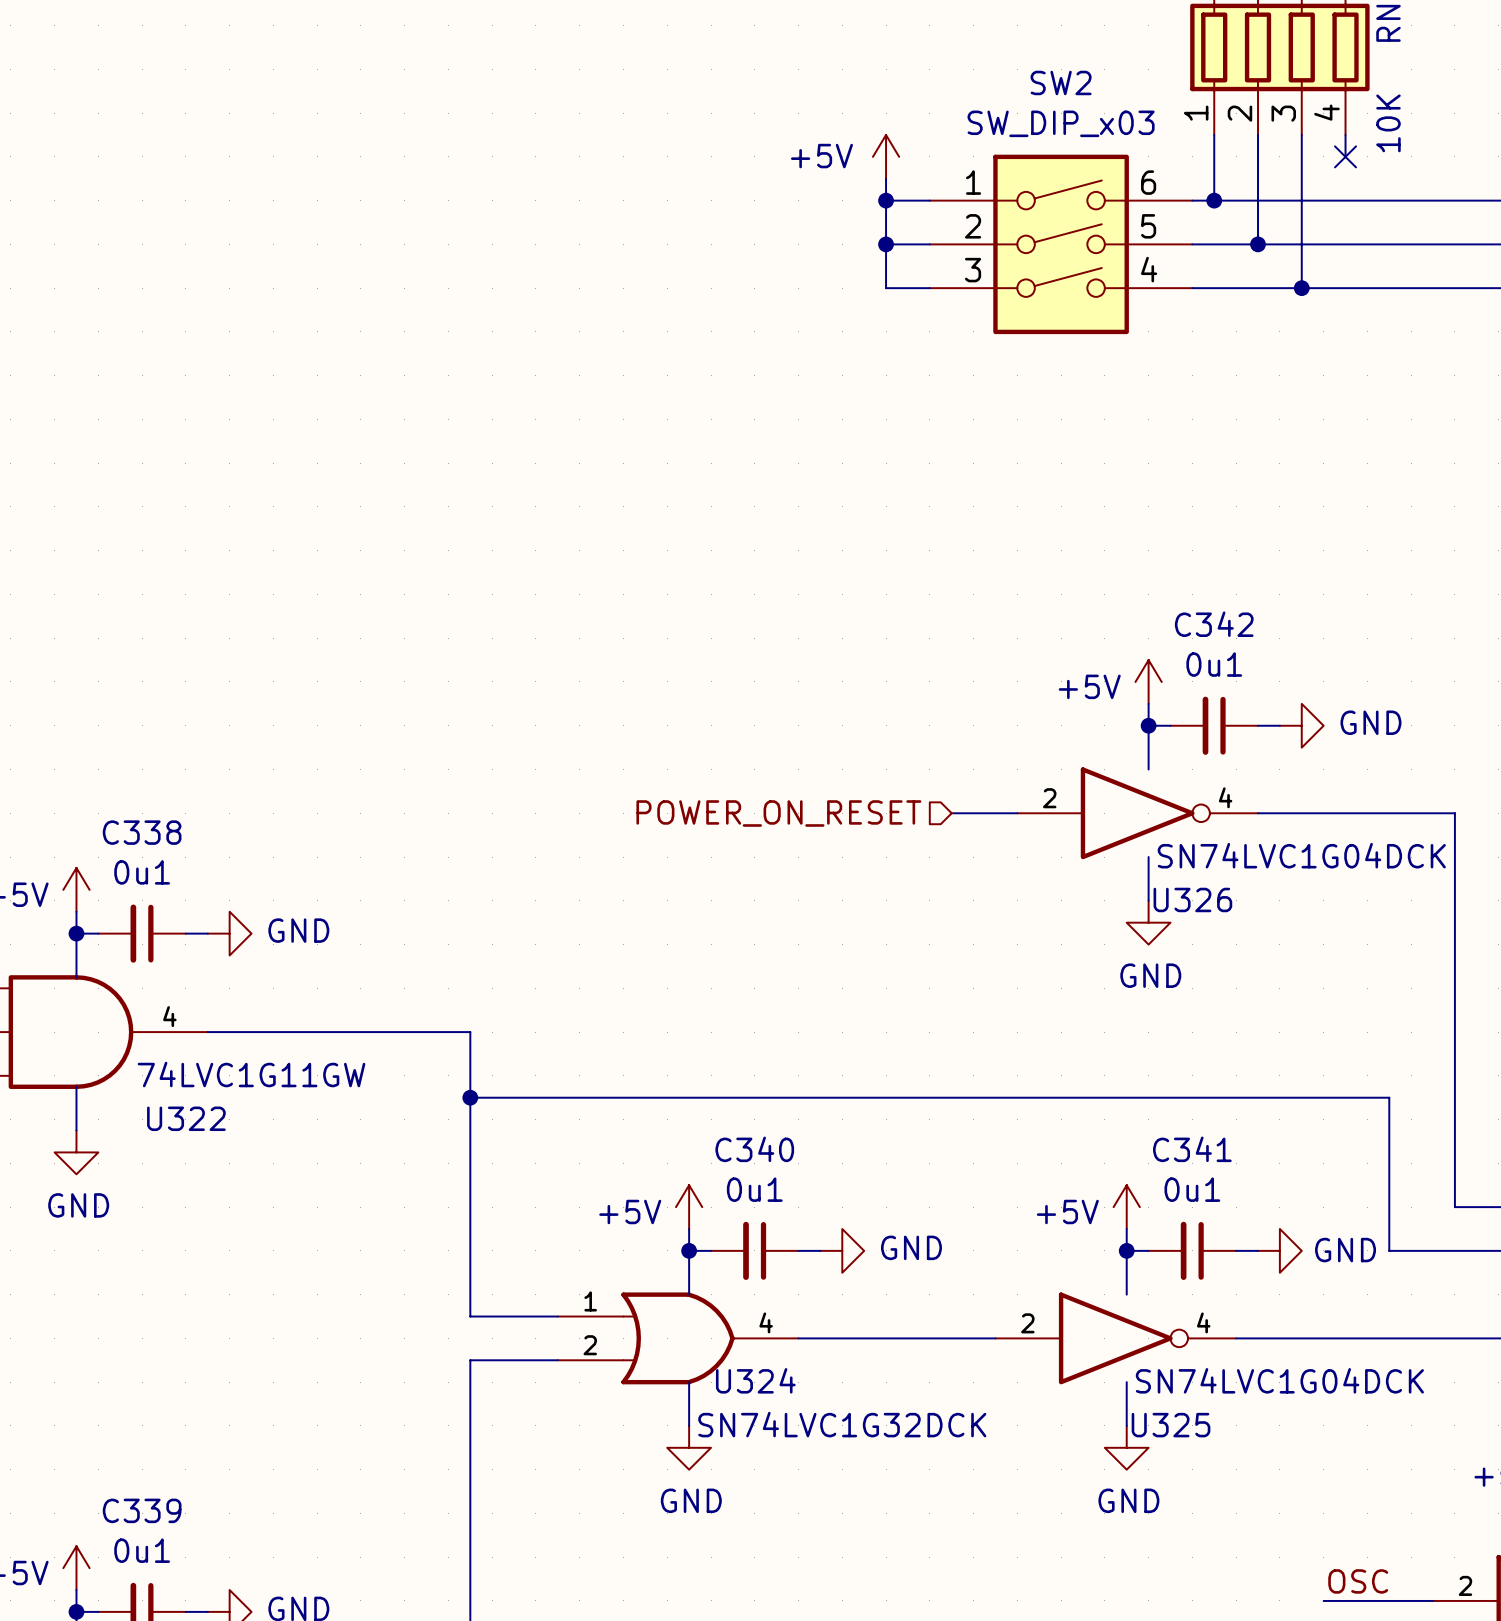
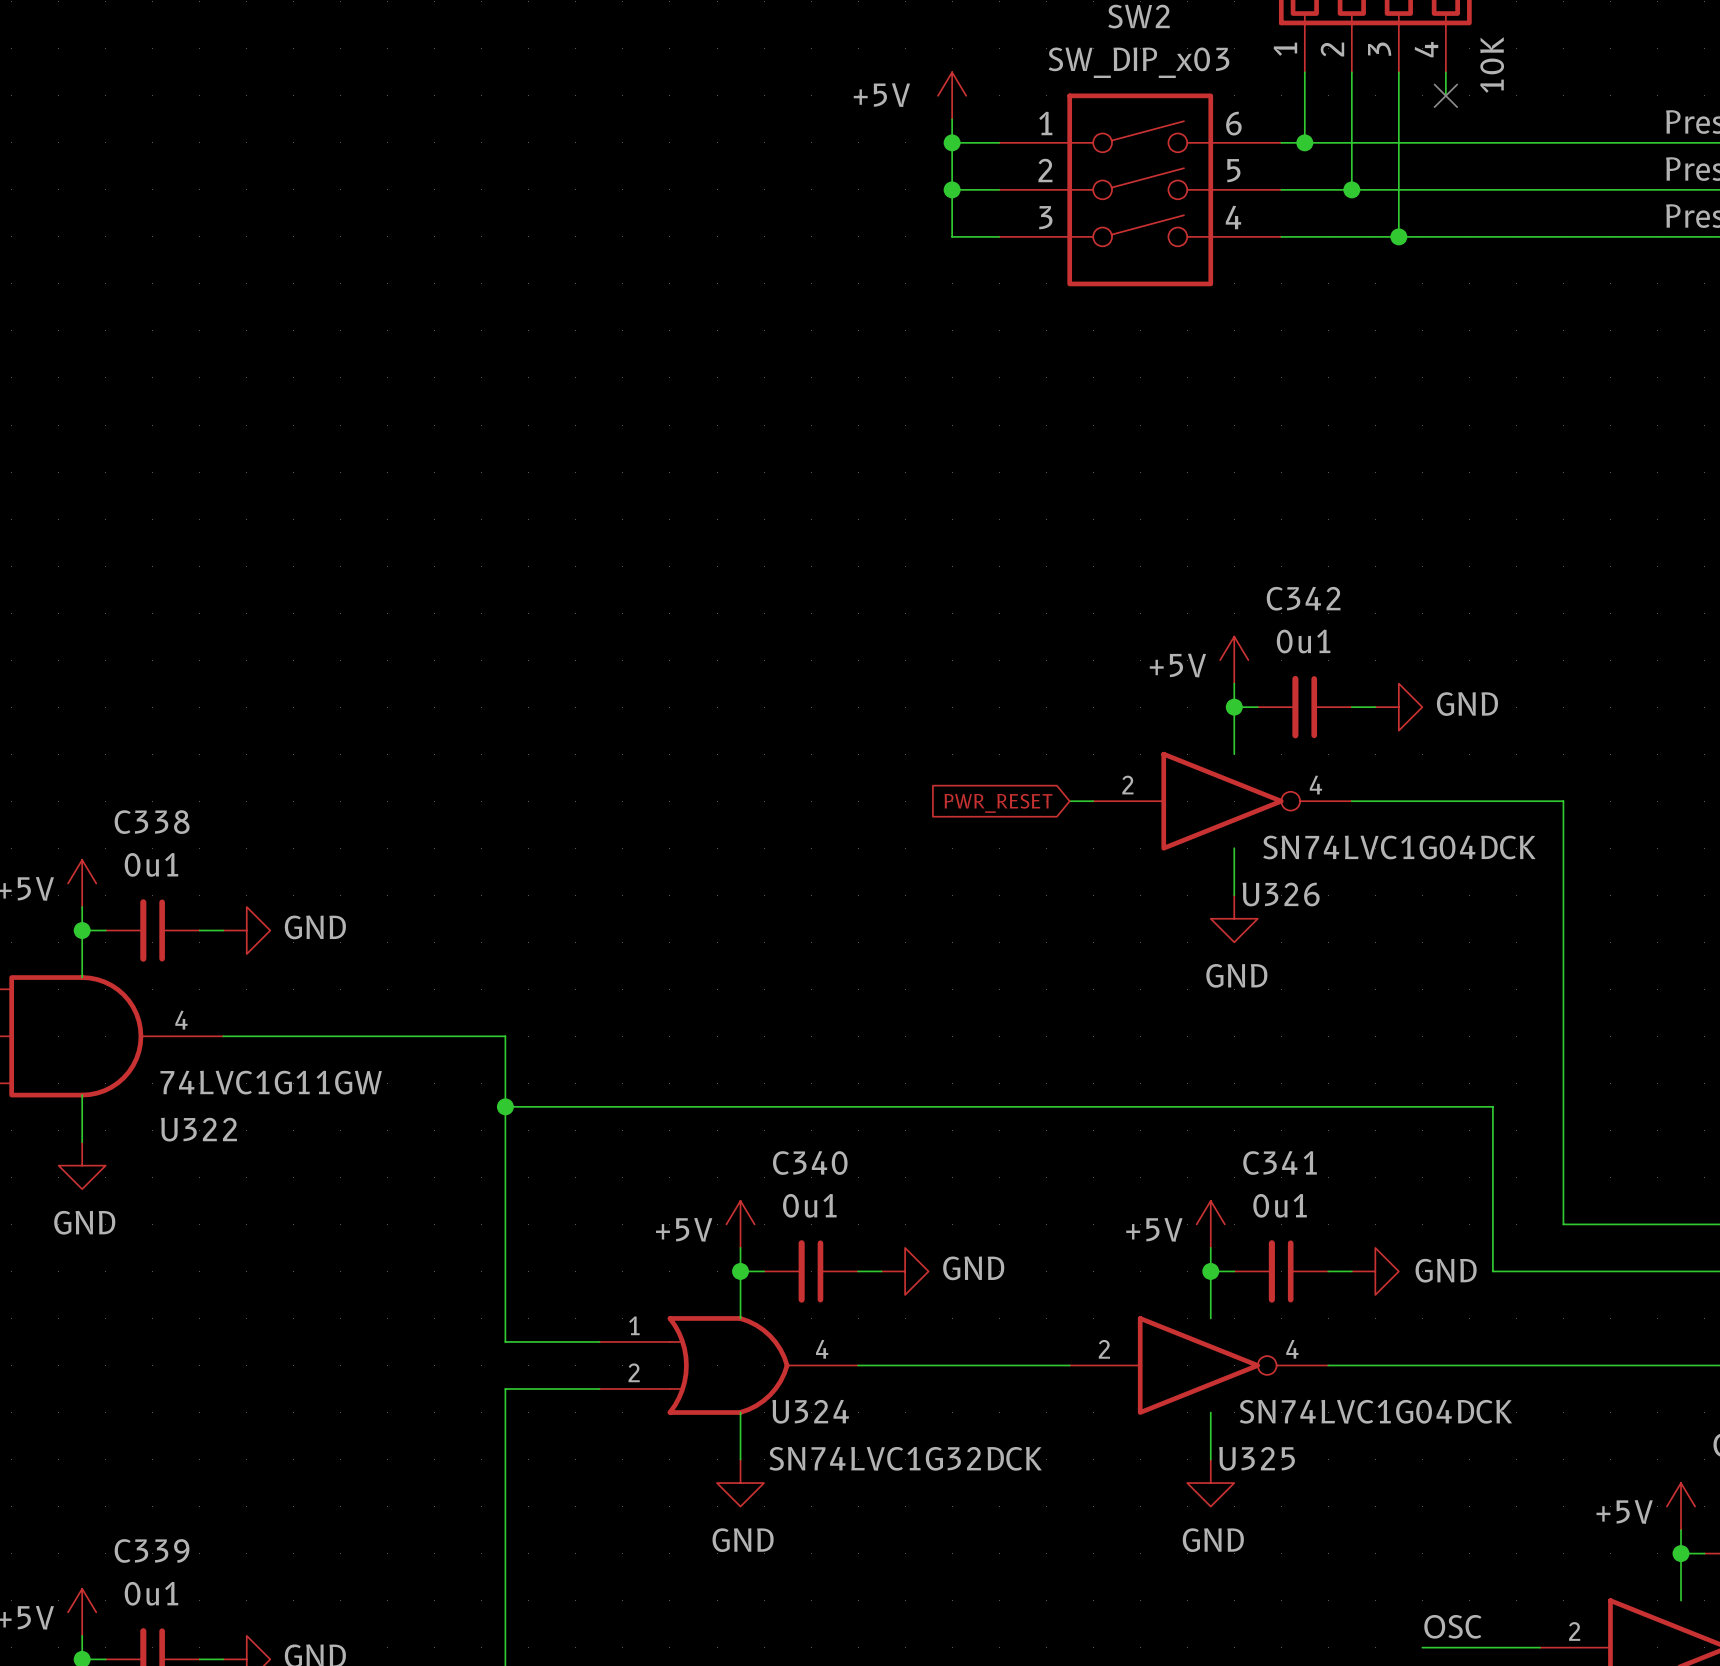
hierarchical label: POWER_ON_RESET (778, 813) -> none
global label: none -> PWR_RESET (998, 803)
wire: (951, 813) (995, 813) -> none

